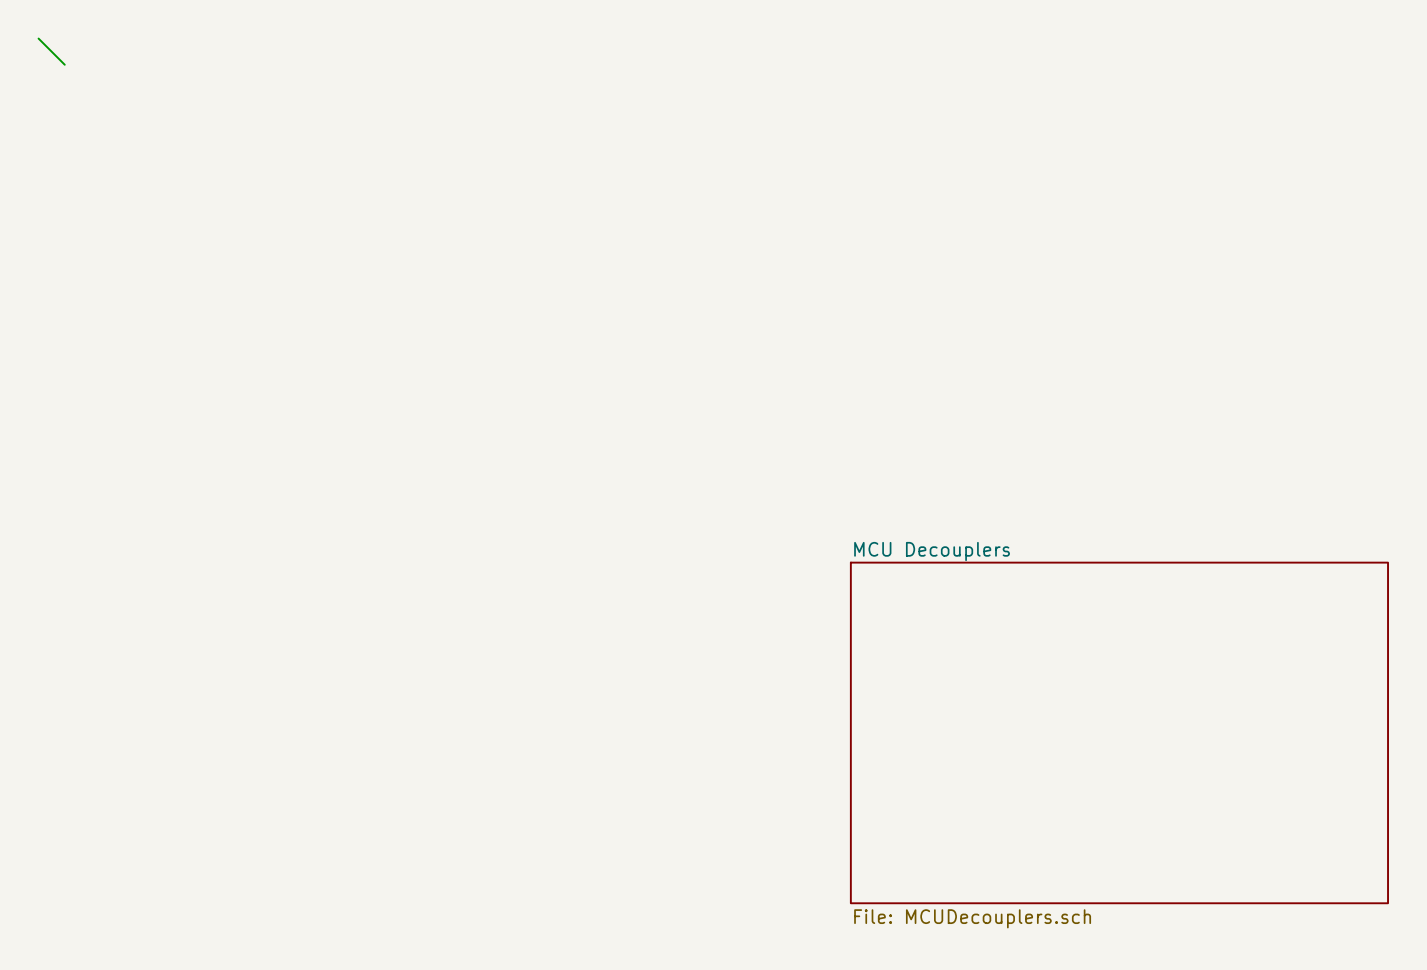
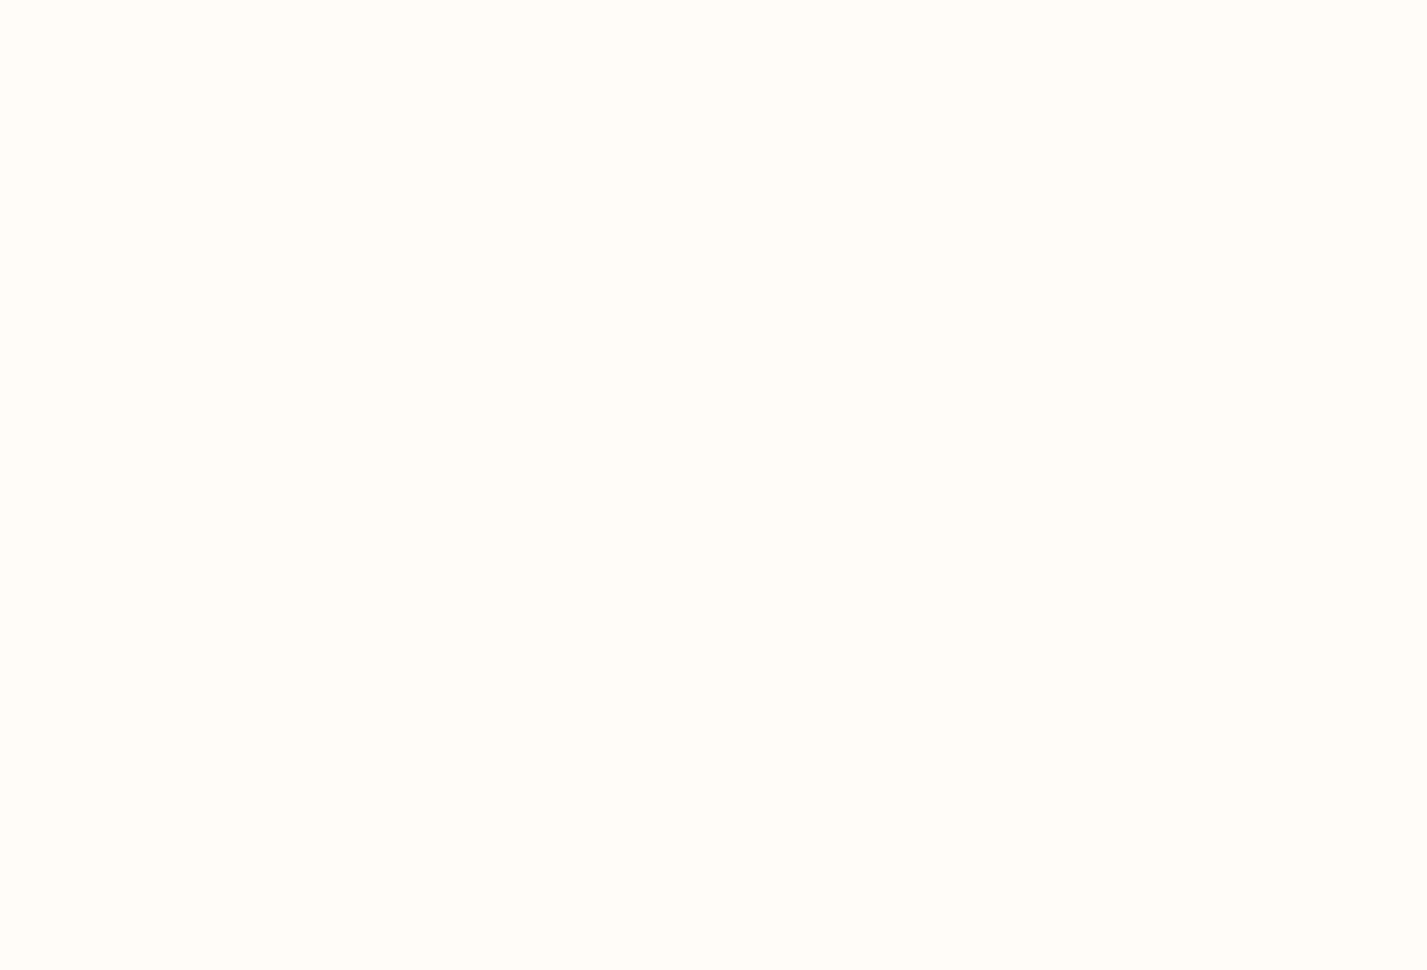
wire: (38, 38) (64, 64) -> none
sheet MCU Decouplers: File: MCUDecouplers.sch (1119, 732) -> none

